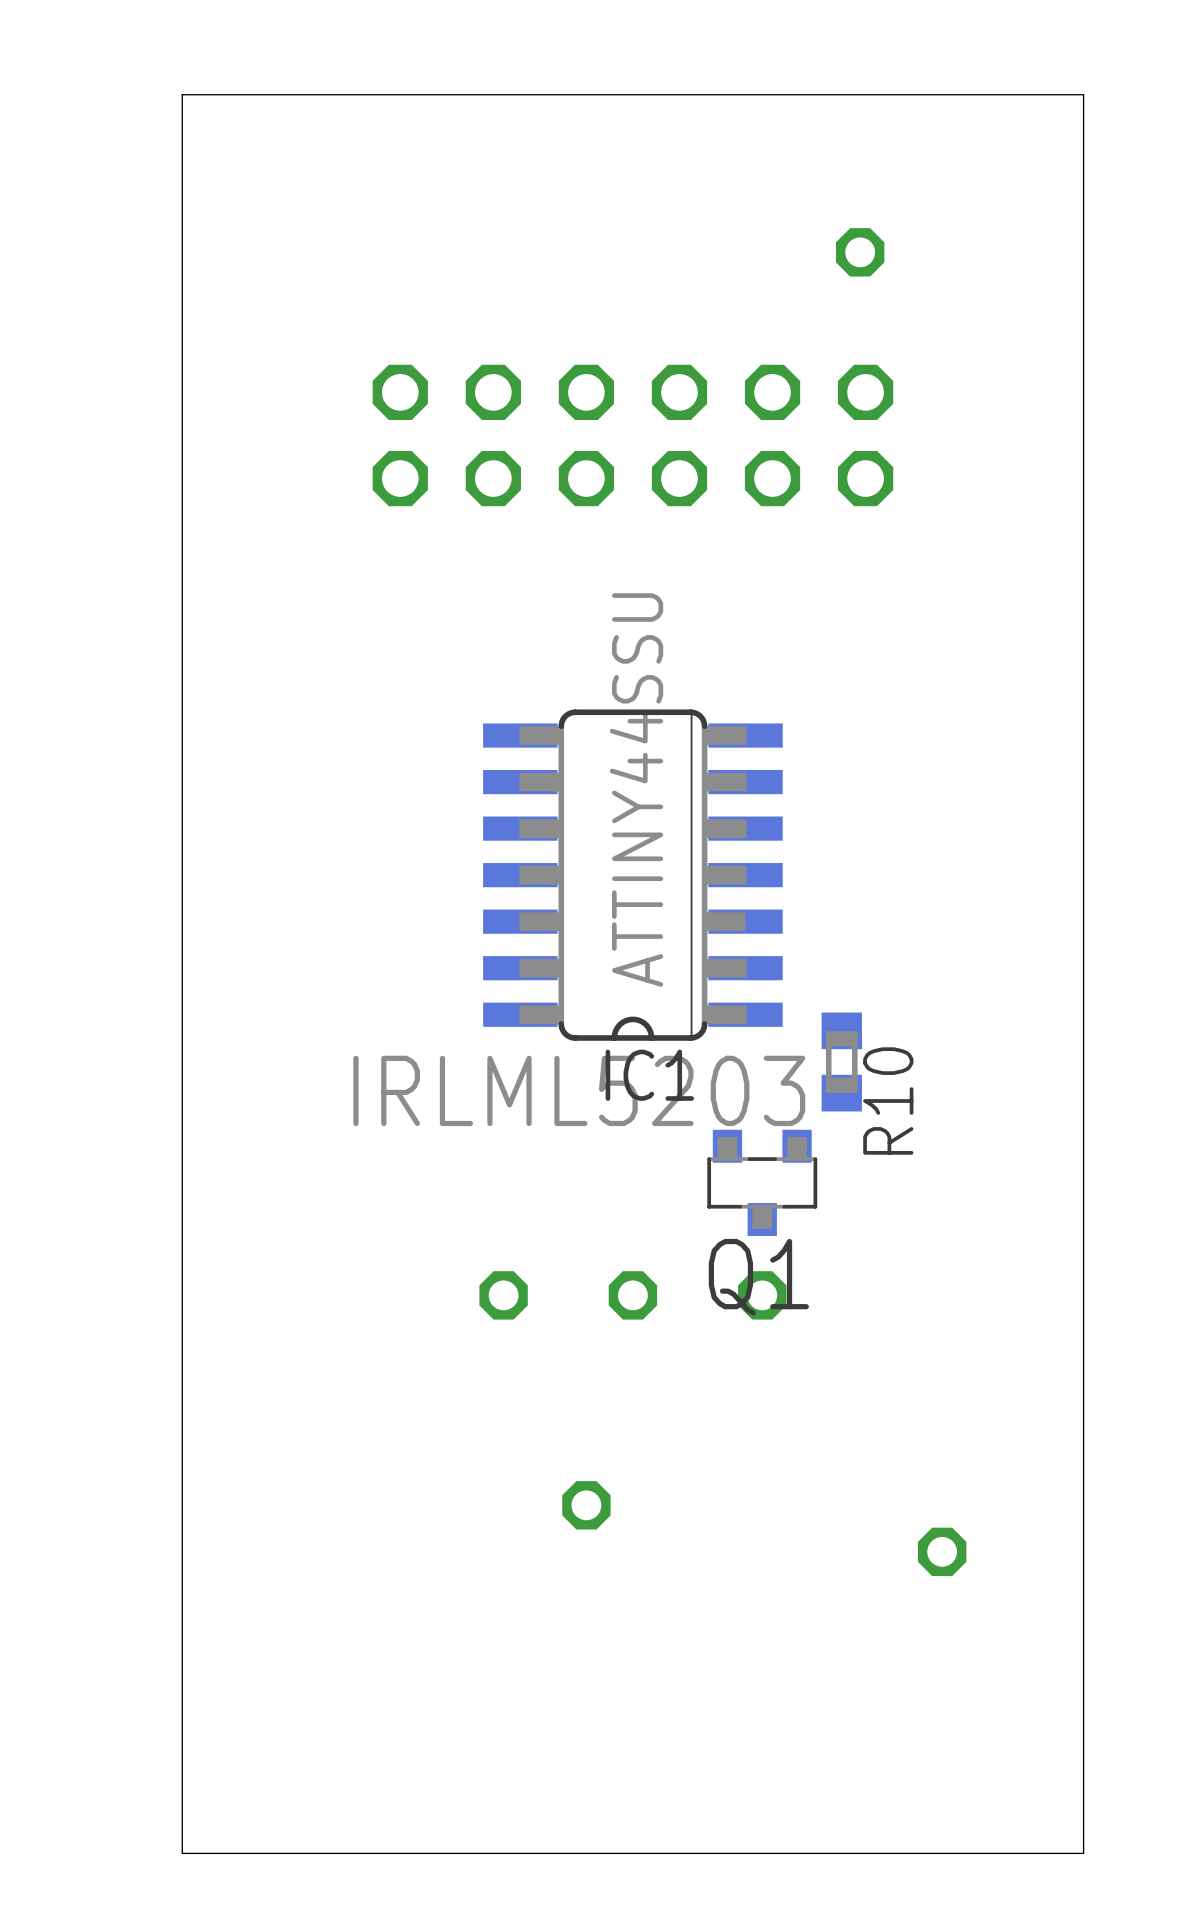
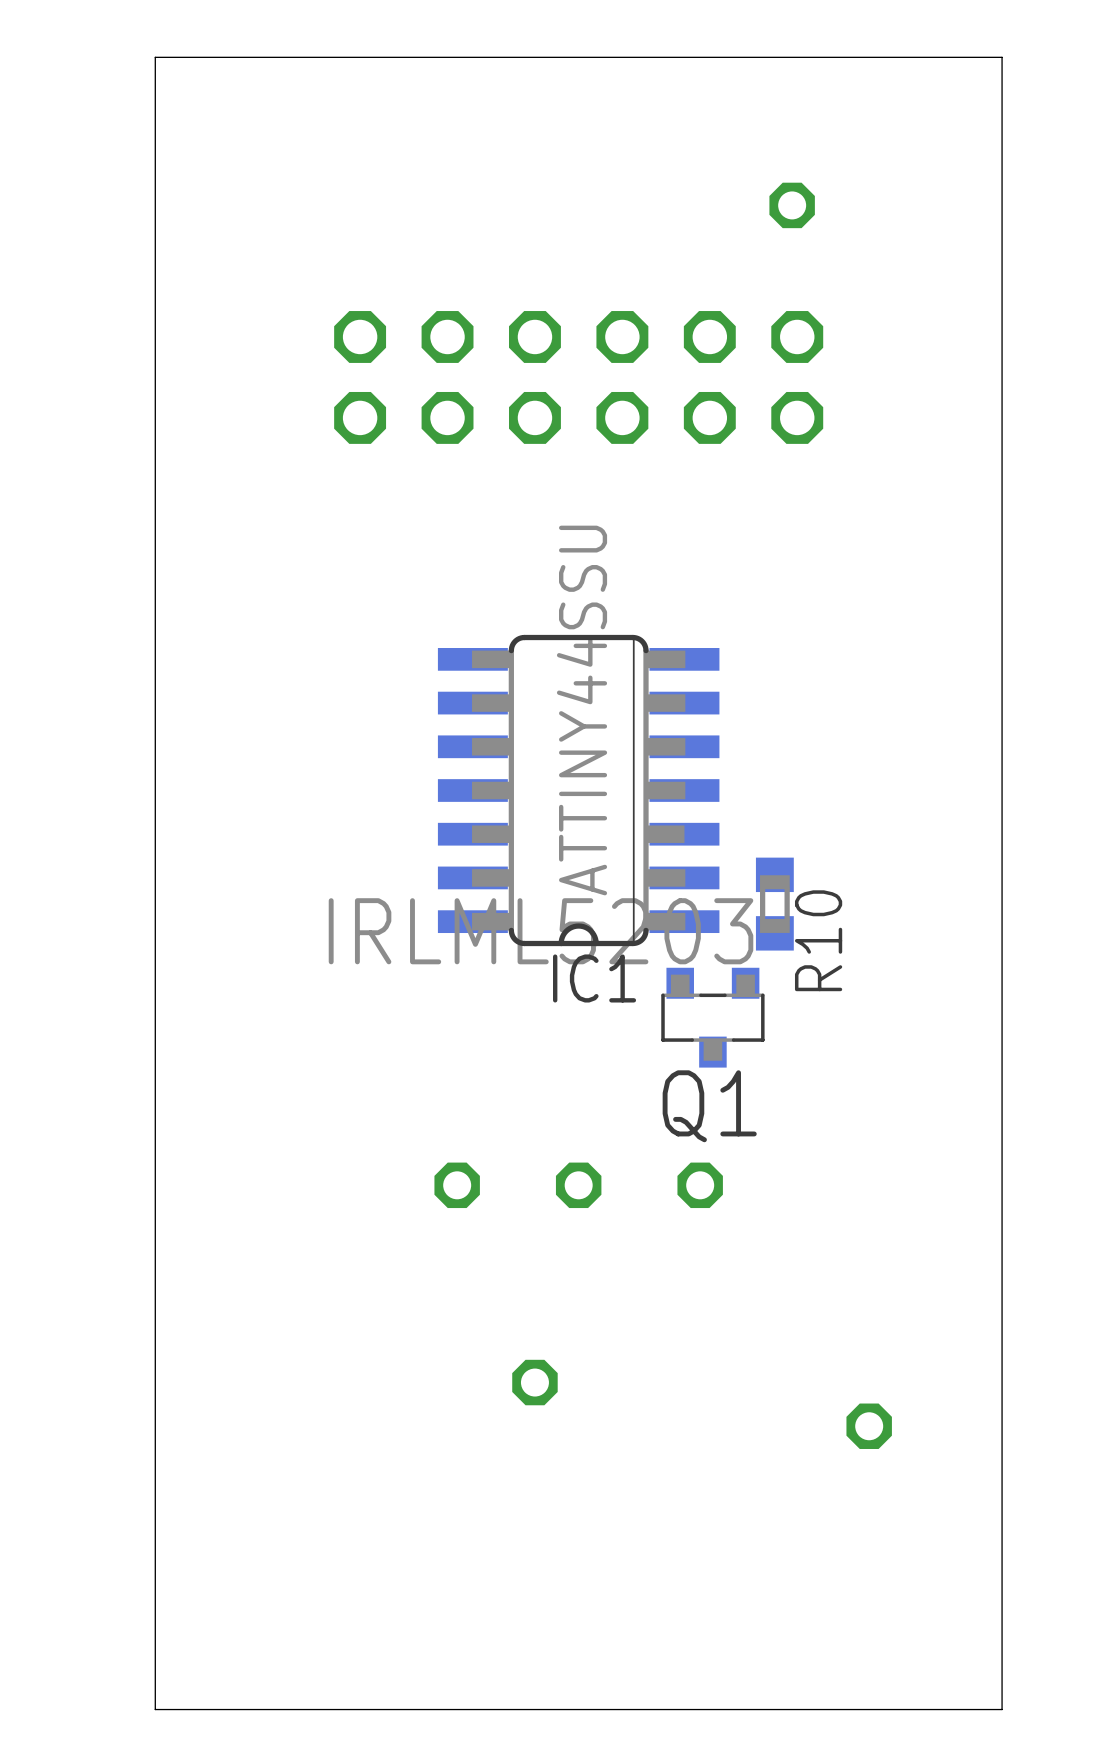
R10 position: (841, 1061) -> (774, 904)
Q1 position: (762, 1182) -> (712, 1017)

